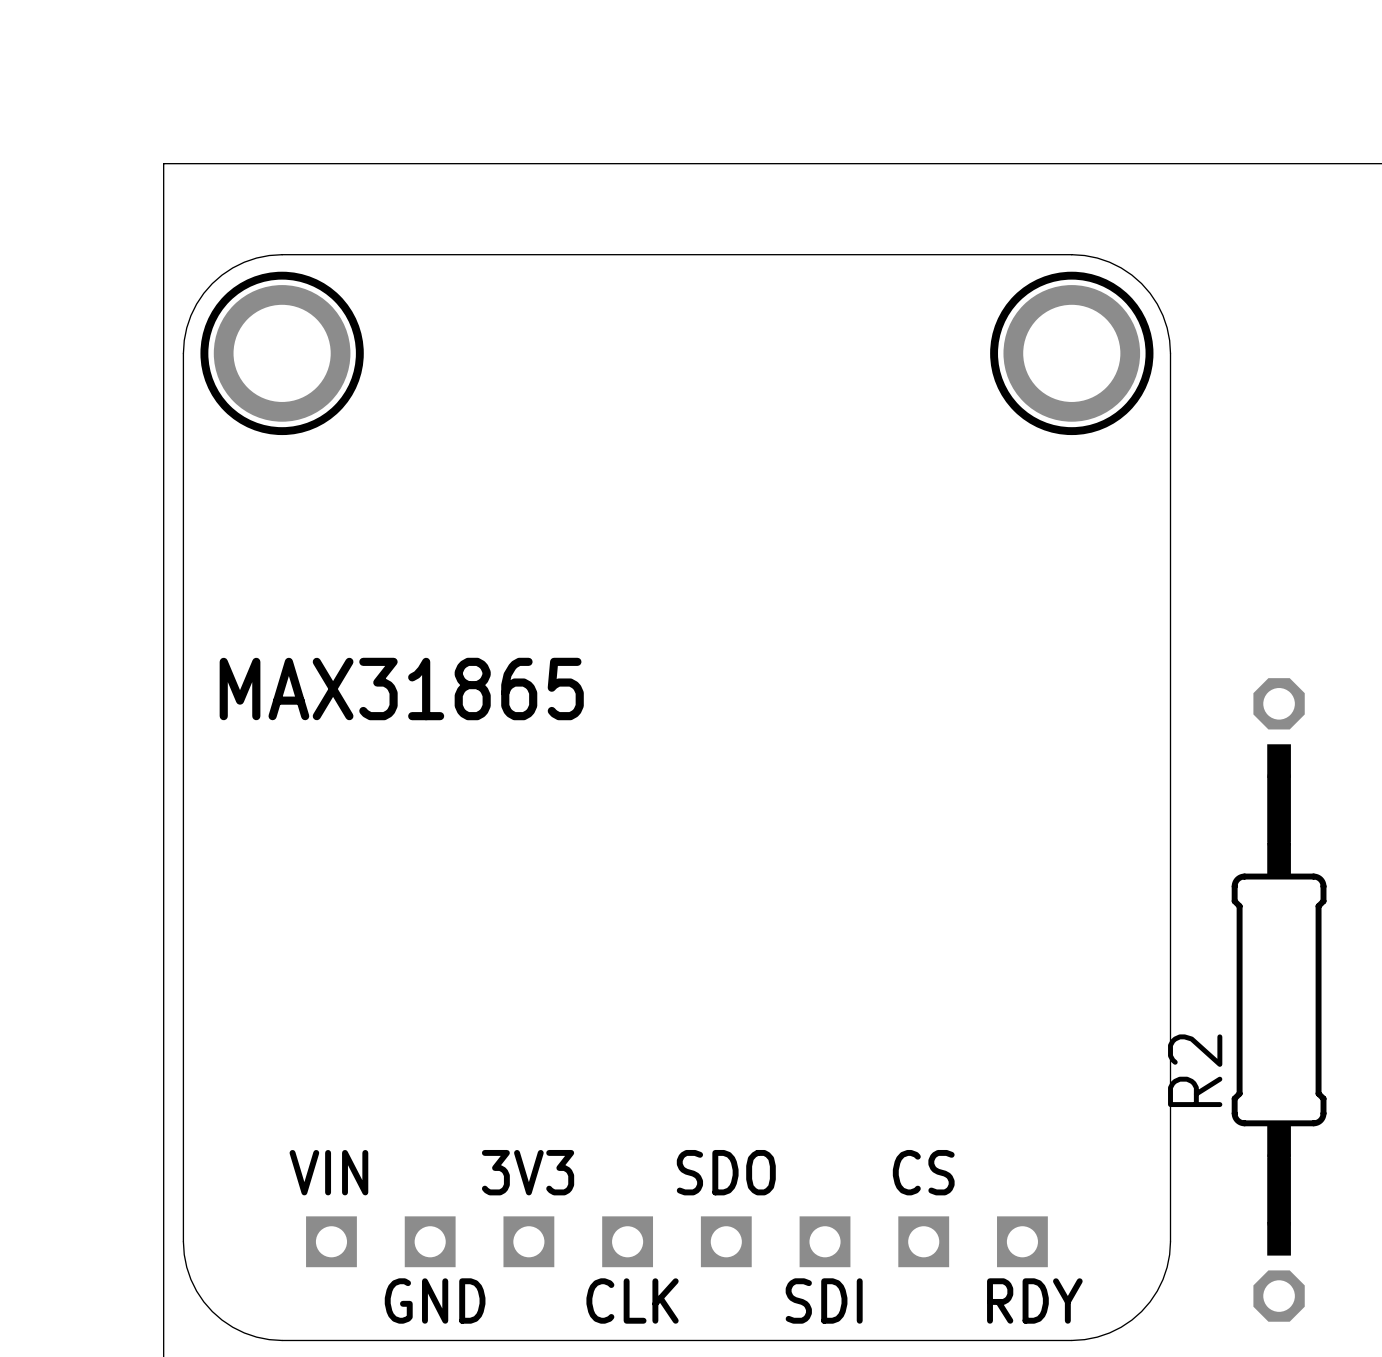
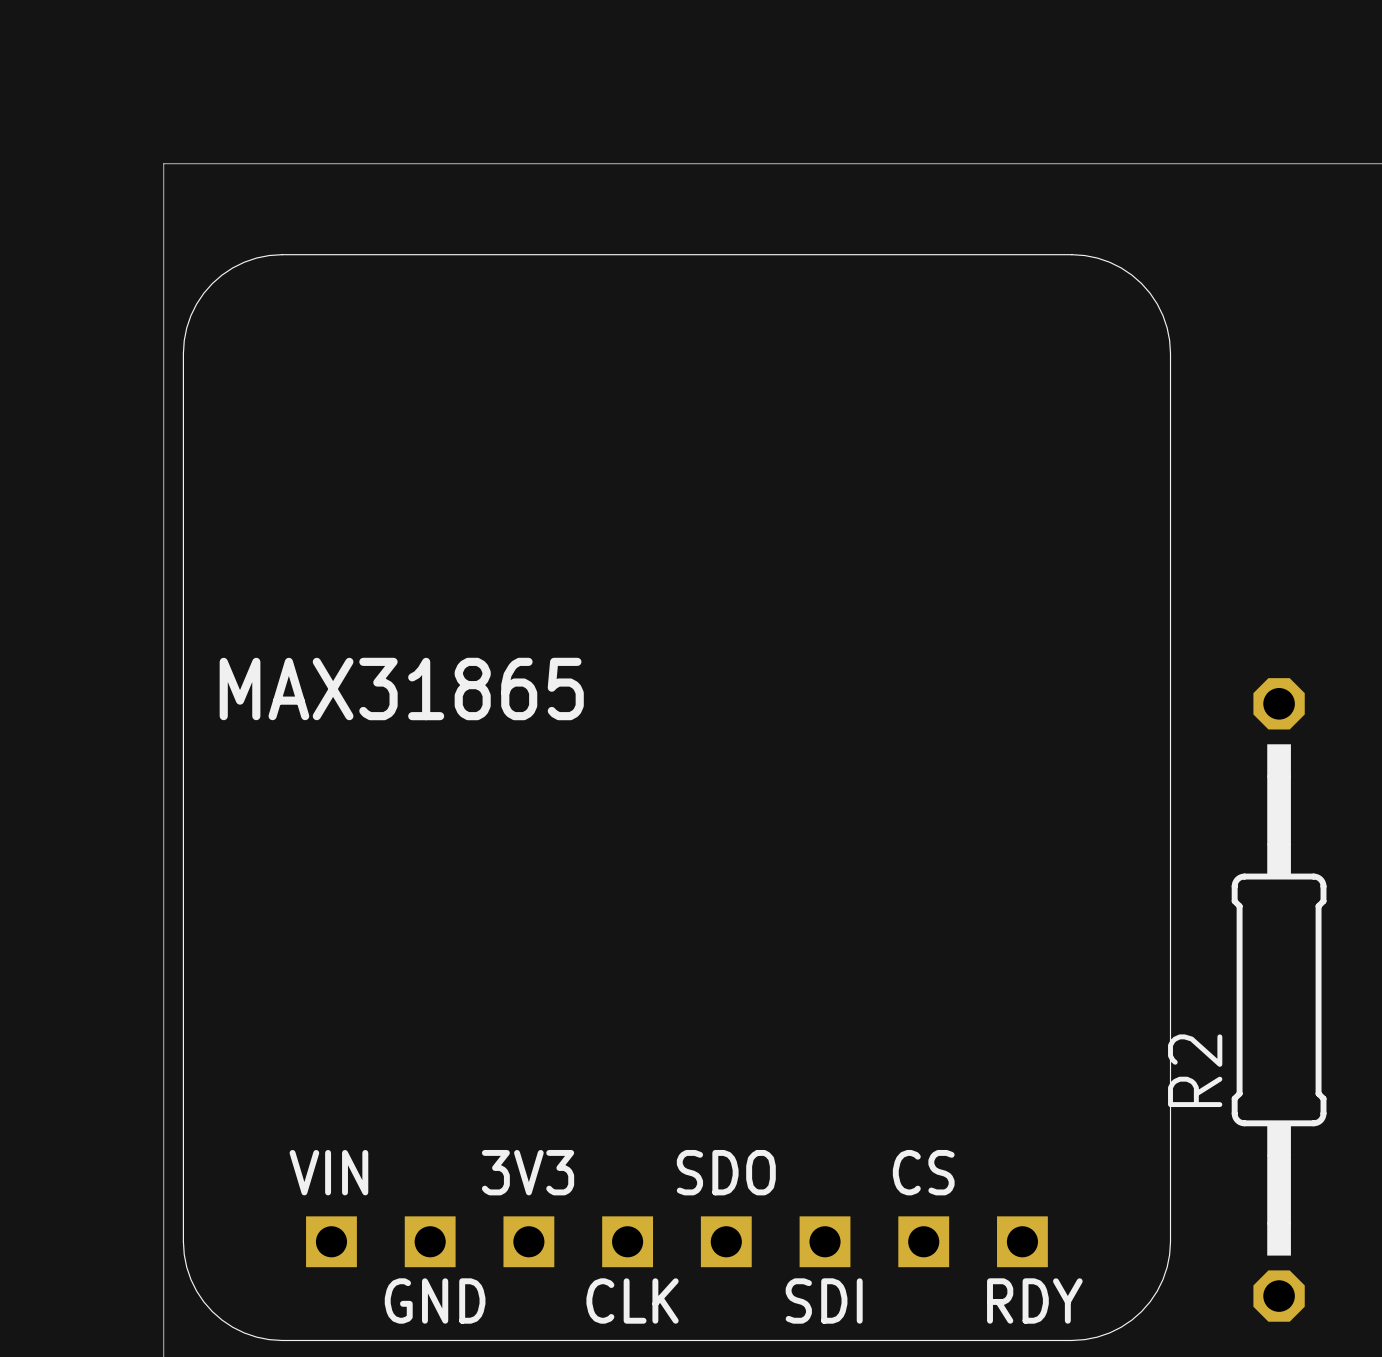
part footprint: [183, 254, 1171, 1341] -> [183, 254, 1171, 1341]

